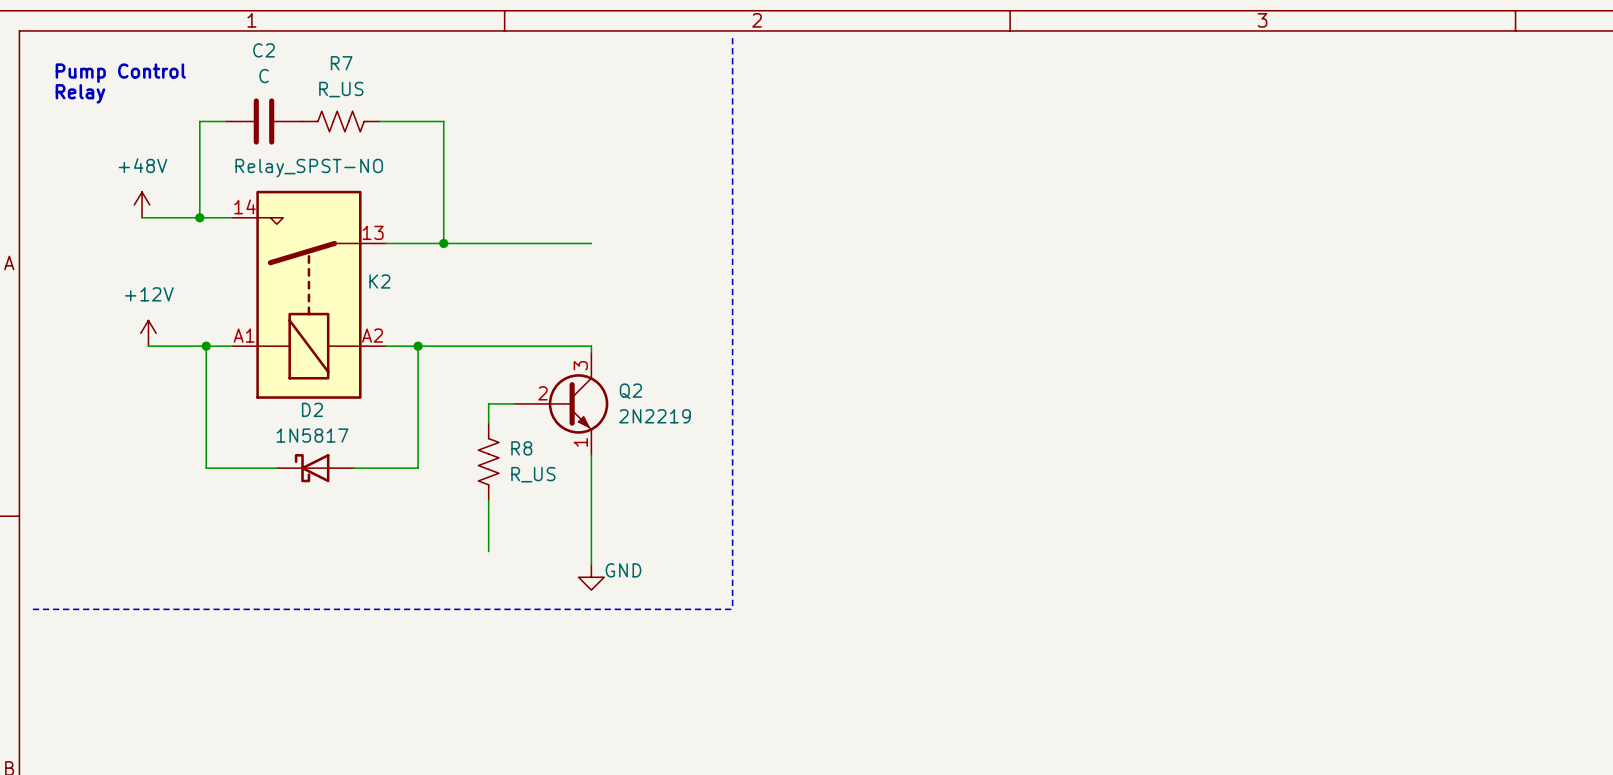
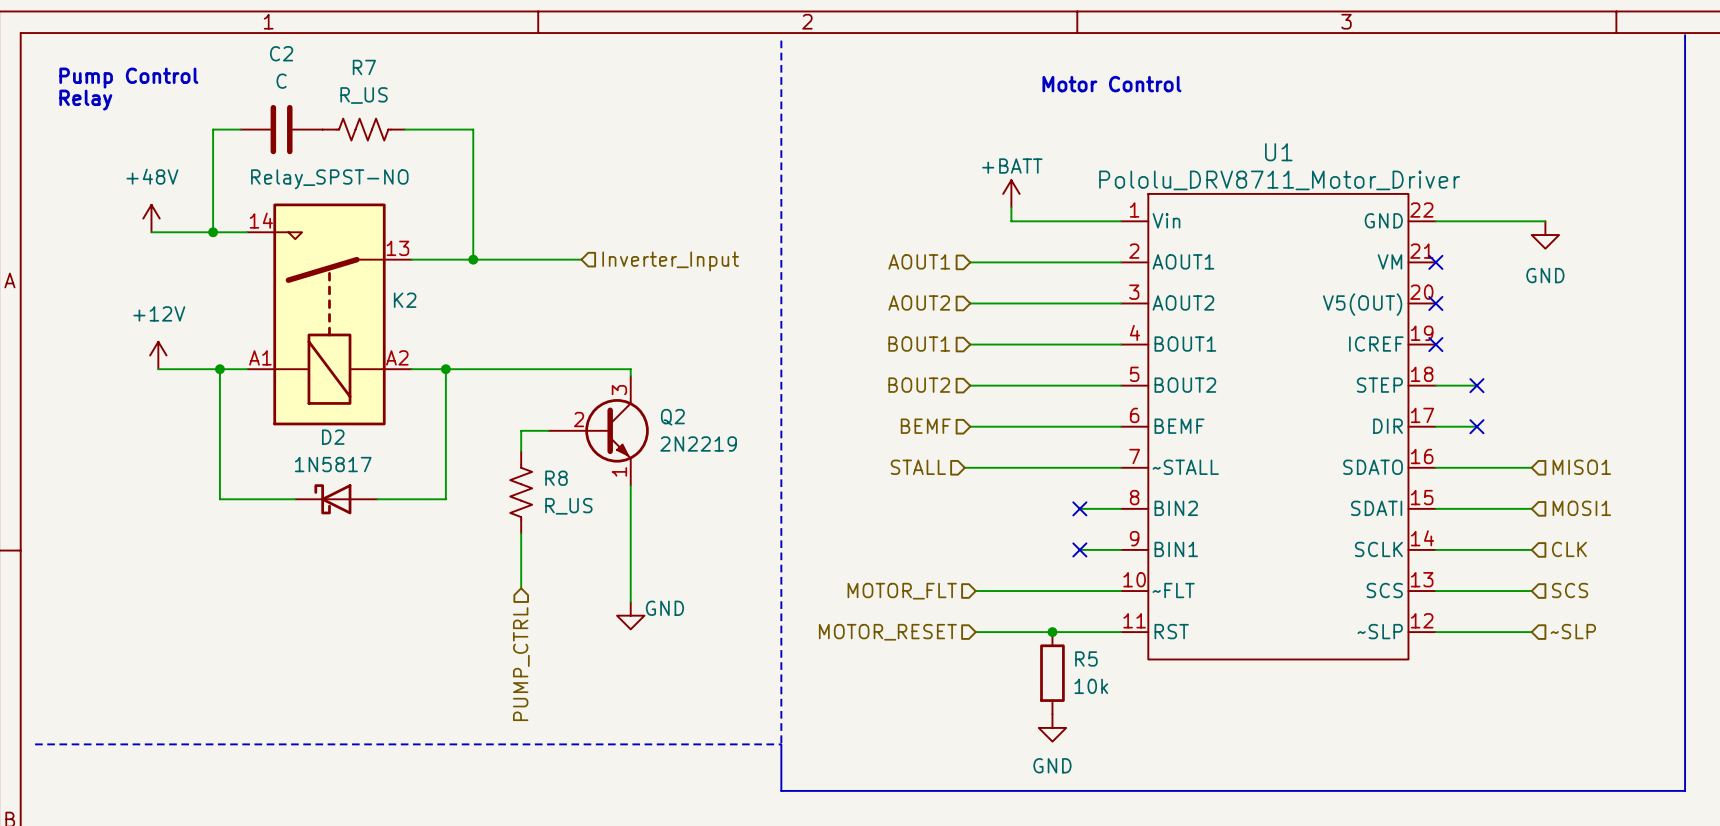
bus: none -> (1685, 35) (1685, 790) (781, 790) (781, 744)
text: none -> Motor Control (1111, 84)
power symbol: none -> +BATT (1011, 193)
wire: none -> (1011, 207) (1011, 221) (1120, 221)
wire: none -> (1435, 221) (1545, 221)
power symbol: none -> GND (1545, 235)
wire: (545, 243) (591, 243) -> none
hierarchical label: none -> Inverter_Input (670, 261)
hierarchical label: none -> AOUT1 (919, 261)
wire: none -> (970, 262) (1120, 262)
no-connect mark: none -> (1435, 262)
hierarchical label: none -> AOUT2 (919, 302)
wire: none -> (970, 303) (1120, 303)
no-connect mark: none -> (1435, 303)
hierarchical label: none -> BOUT1 (919, 344)
wire: none -> (970, 344) (1120, 344)
no-connect mark: none -> (1435, 344)
hierarchical label: none -> BOUT2 (919, 385)
wire: none -> (970, 385) (1120, 385)
wire: none -> (1435, 385) (1476, 385)
no-connect mark: none -> (1476, 385)
hierarchical label: none -> BEMF (925, 426)
wire: none -> (970, 426) (1120, 426)
U1: none -> Pololu_DRV8711_Motor_Driver (1278, 426)
wire: none -> (1435, 426) (1476, 426)
no-connect mark: none -> (1476, 426)
hierarchical label: none -> STALL (918, 467)
wire: none -> (964, 467) (1120, 467)
wire: none -> (1435, 467) (1531, 467)
hierarchical label: none -> MISO1 (1581, 467)
hierarchical label: none -> MOSI1 (1581, 508)
wire: none -> (1079, 508) (1120, 508)
no-connect mark: none -> (1079, 508)
wire: none -> (1435, 508) (1531, 508)
wire: none -> (1079, 549) (1120, 549)
no-connect mark: none -> (1079, 549)
wire: none -> (1435, 549) (1531, 549)
hierarchical label: none -> CLK (1569, 549)
hierarchical label: none -> SCS (1570, 590)
hierarchical label: none -> MOTOR_FLT (902, 591)
wire: none -> (975, 591) (1120, 591)
wire: none -> (1435, 591) (1531, 591)
hierarchical label: none -> MOTOR_RESET (887, 632)
wire: none -> (975, 632) (1120, 632)
junction: none -> (1052, 632)
wire: none -> (1435, 632) (1531, 632)
hierarchical label: none -> ~SLP (1573, 631)
line: (32, 609) (732, 609) -> (35, 744) (781, 744) (781, 649)
hierarchical label: none -> PUMP_CTRL (521, 664)
R5: none -> 10k (1052, 673)
power symbol: none -> GND (1052, 727)

